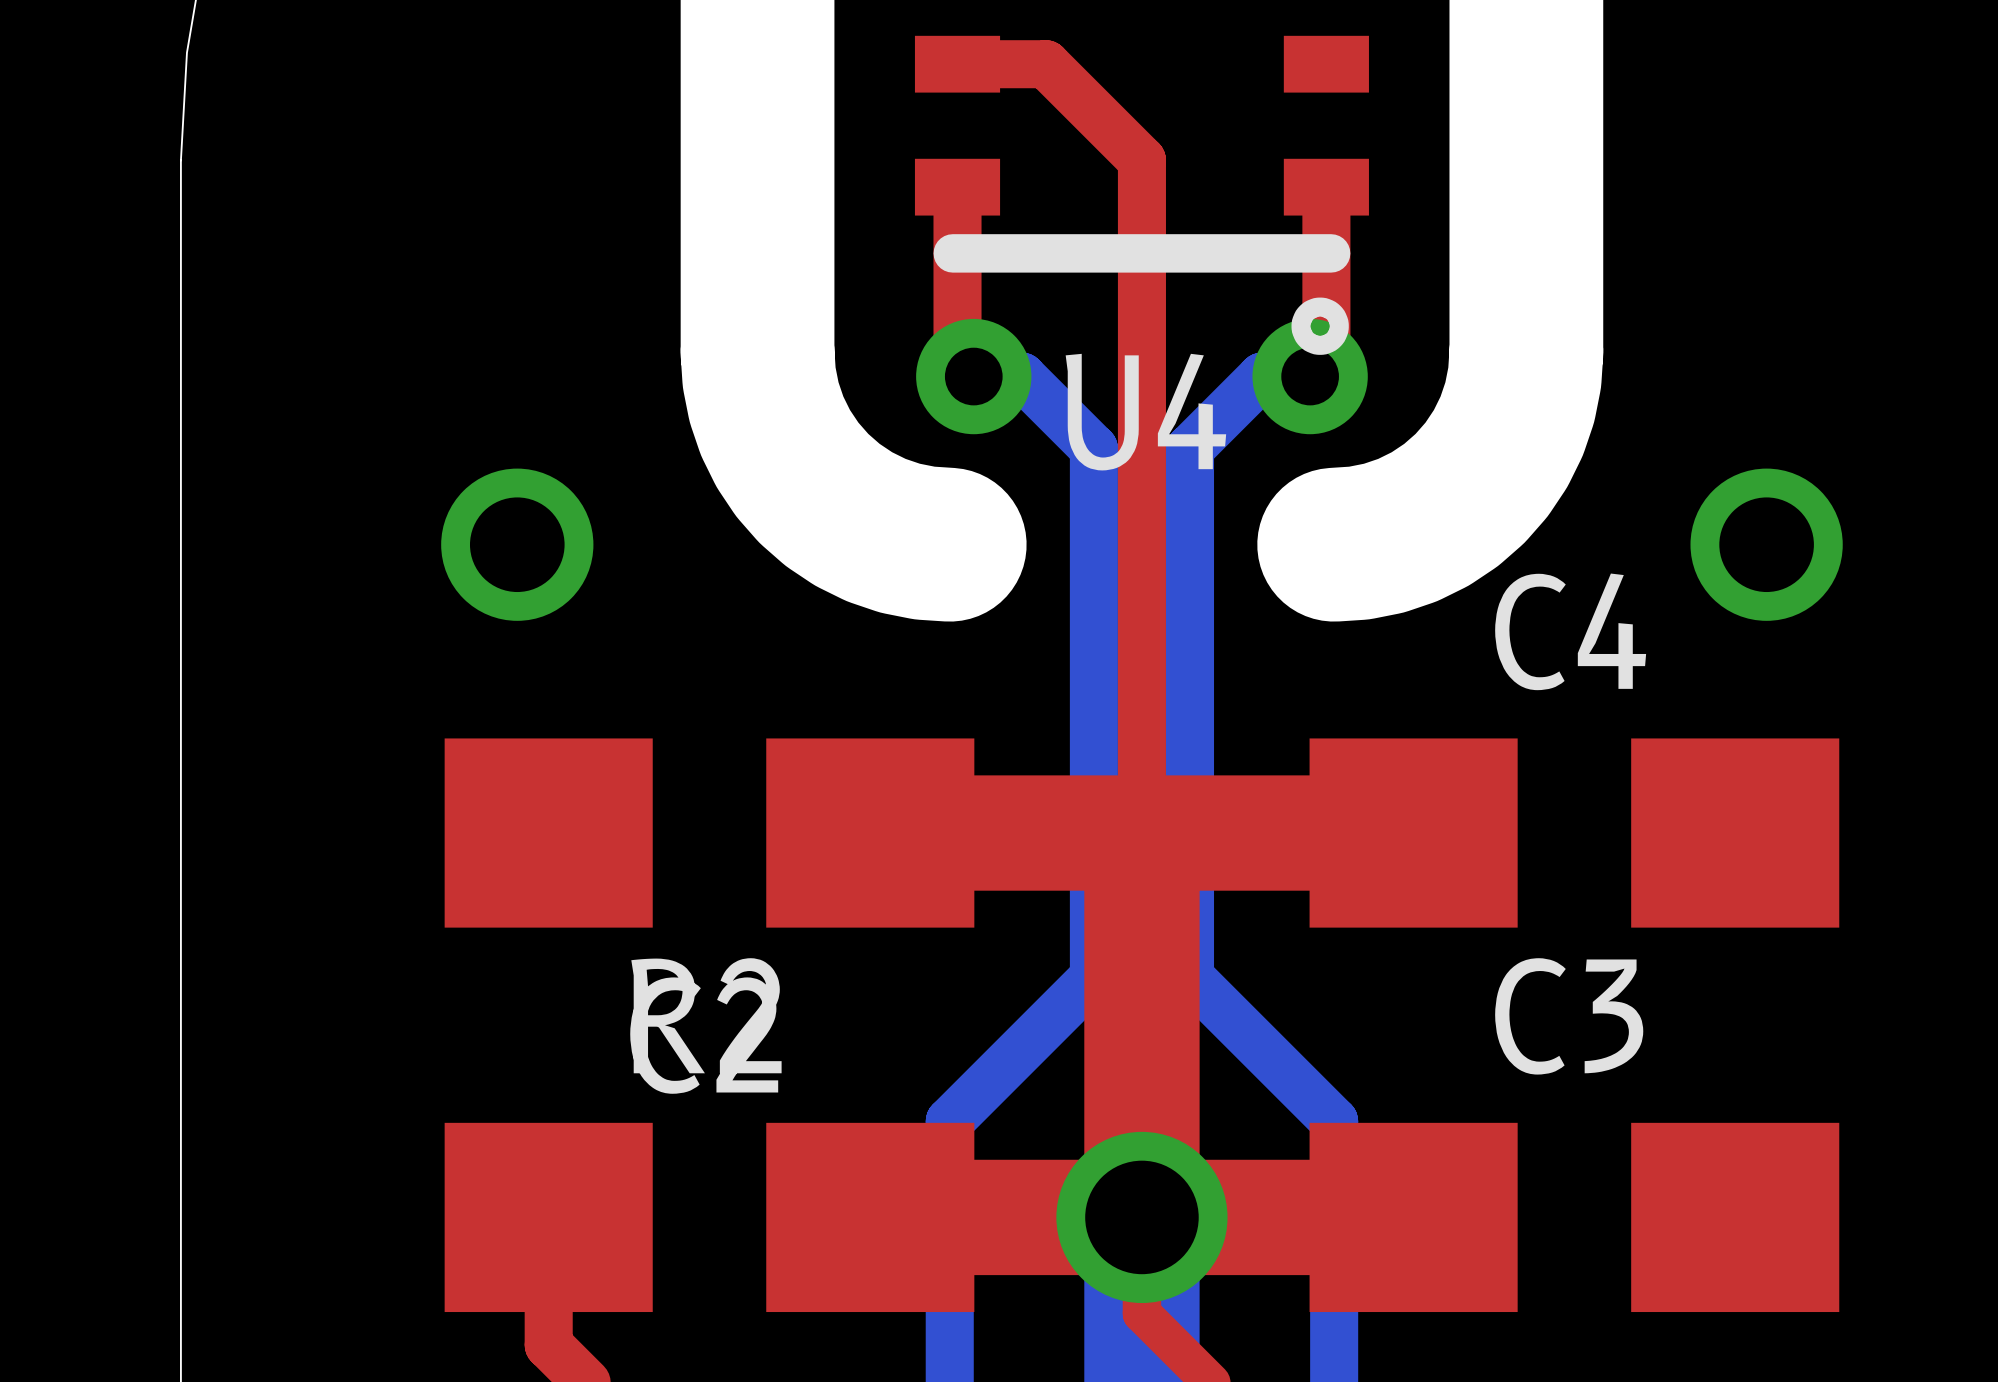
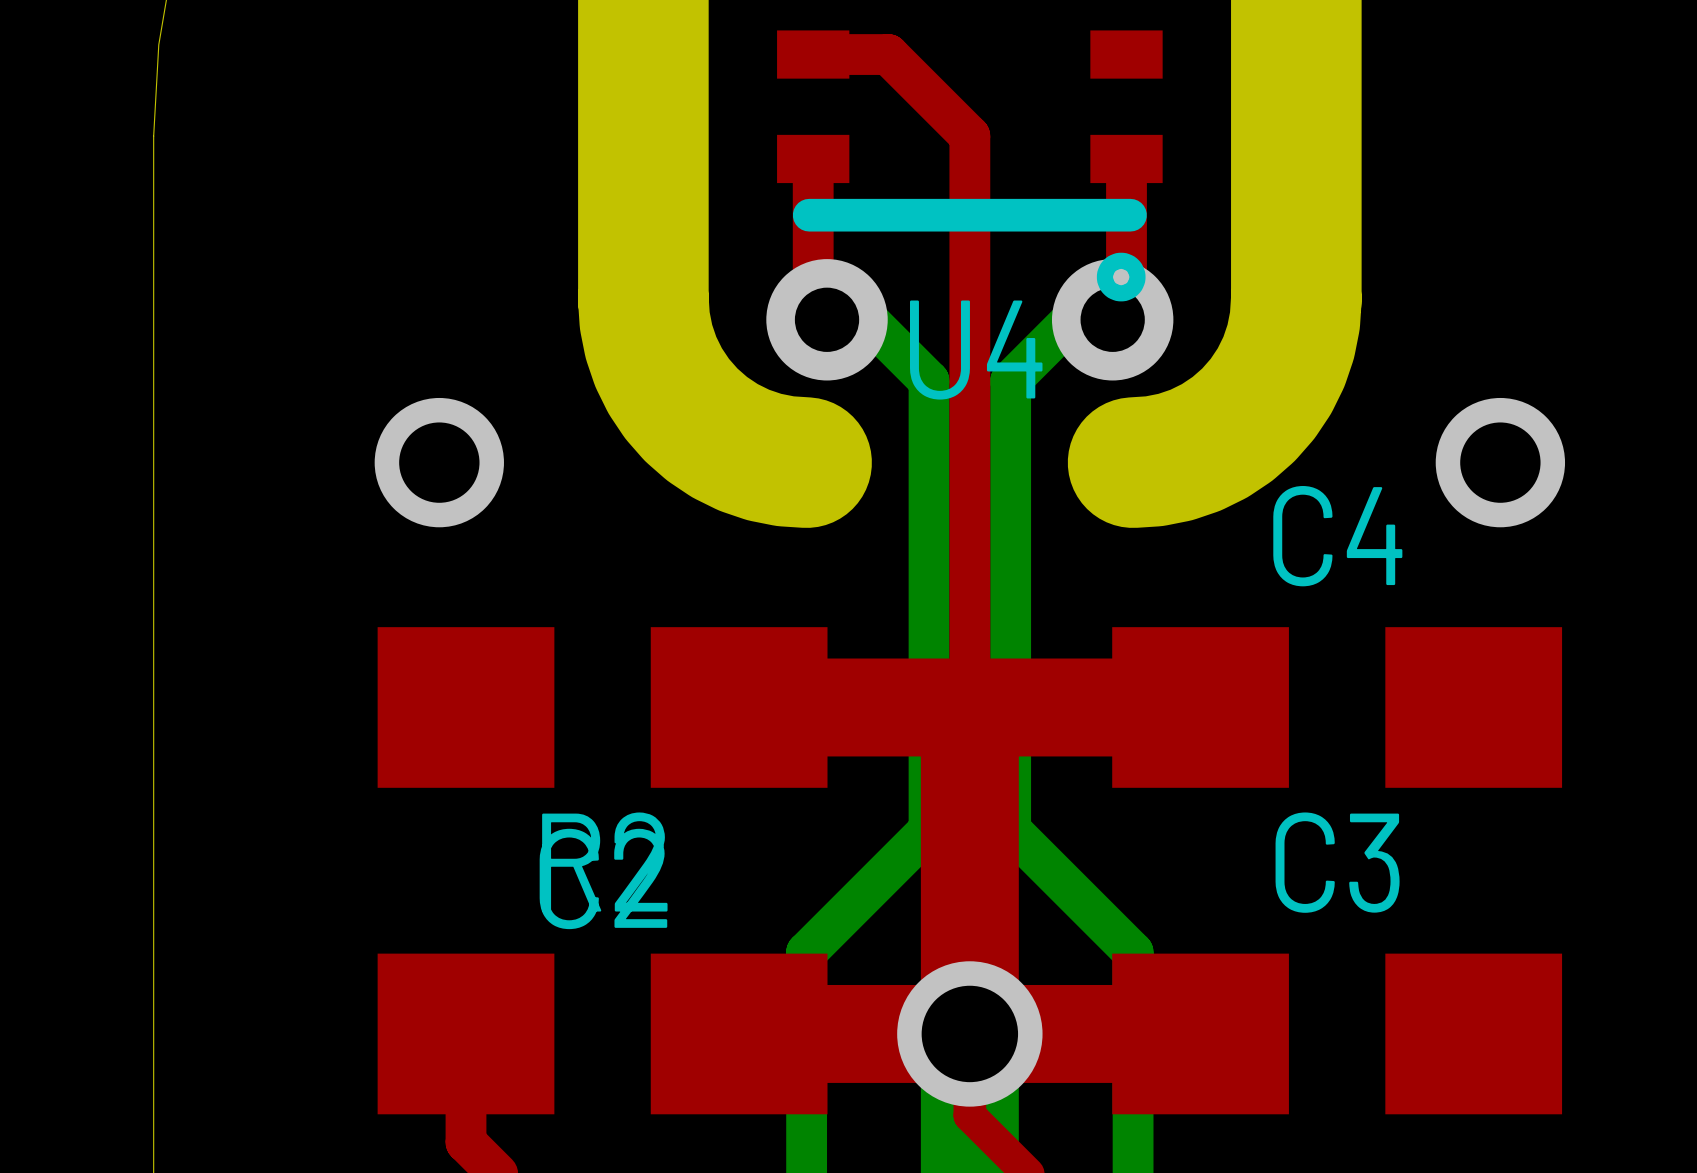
via size: [916, 318, 1032, 435] -> [766, 259, 888, 381]
via size: [1252, 318, 1368, 435] -> [1051, 259, 1174, 381]

